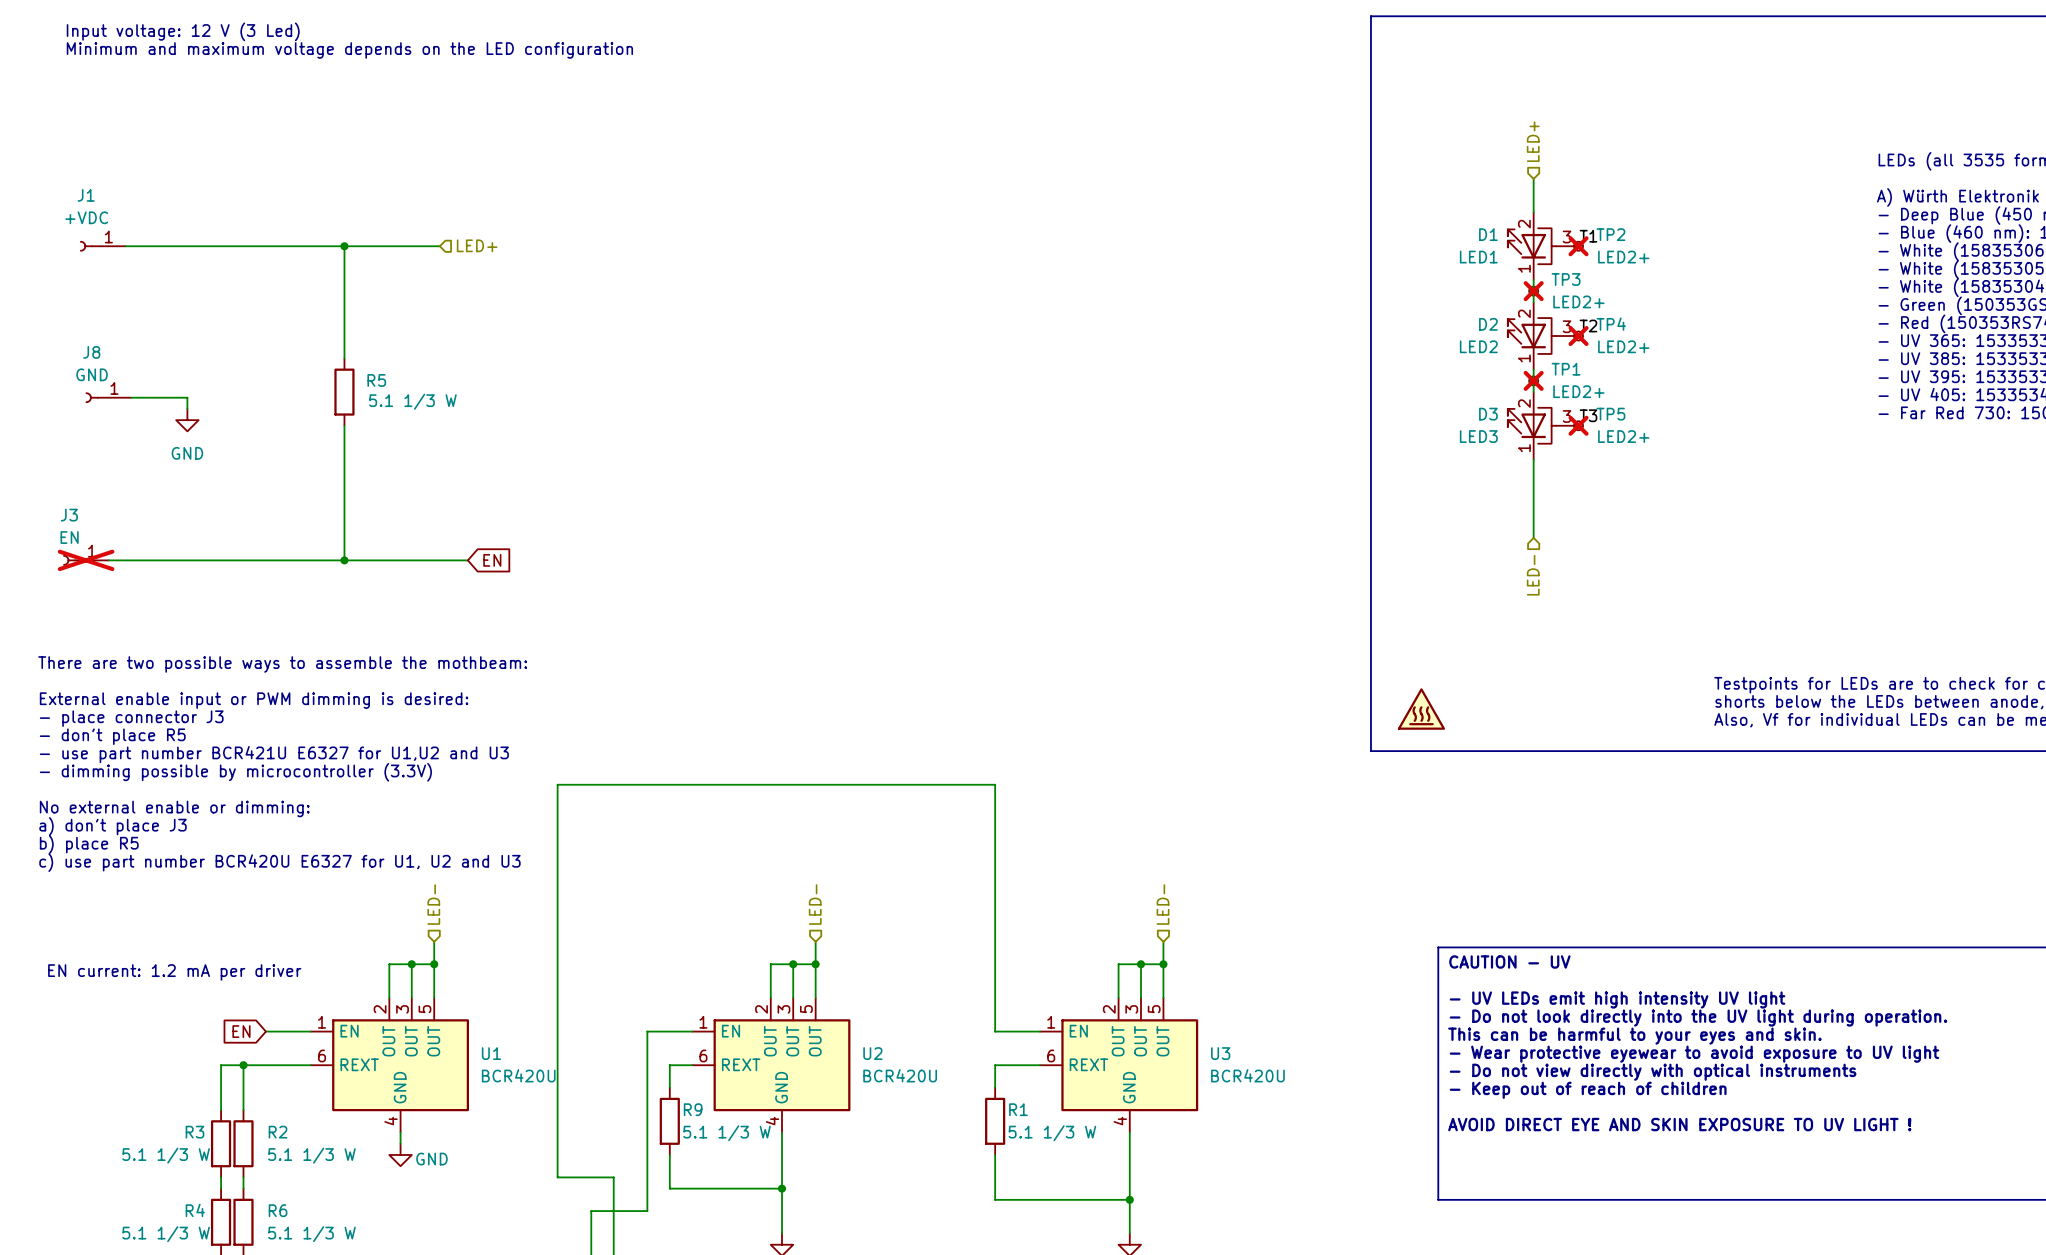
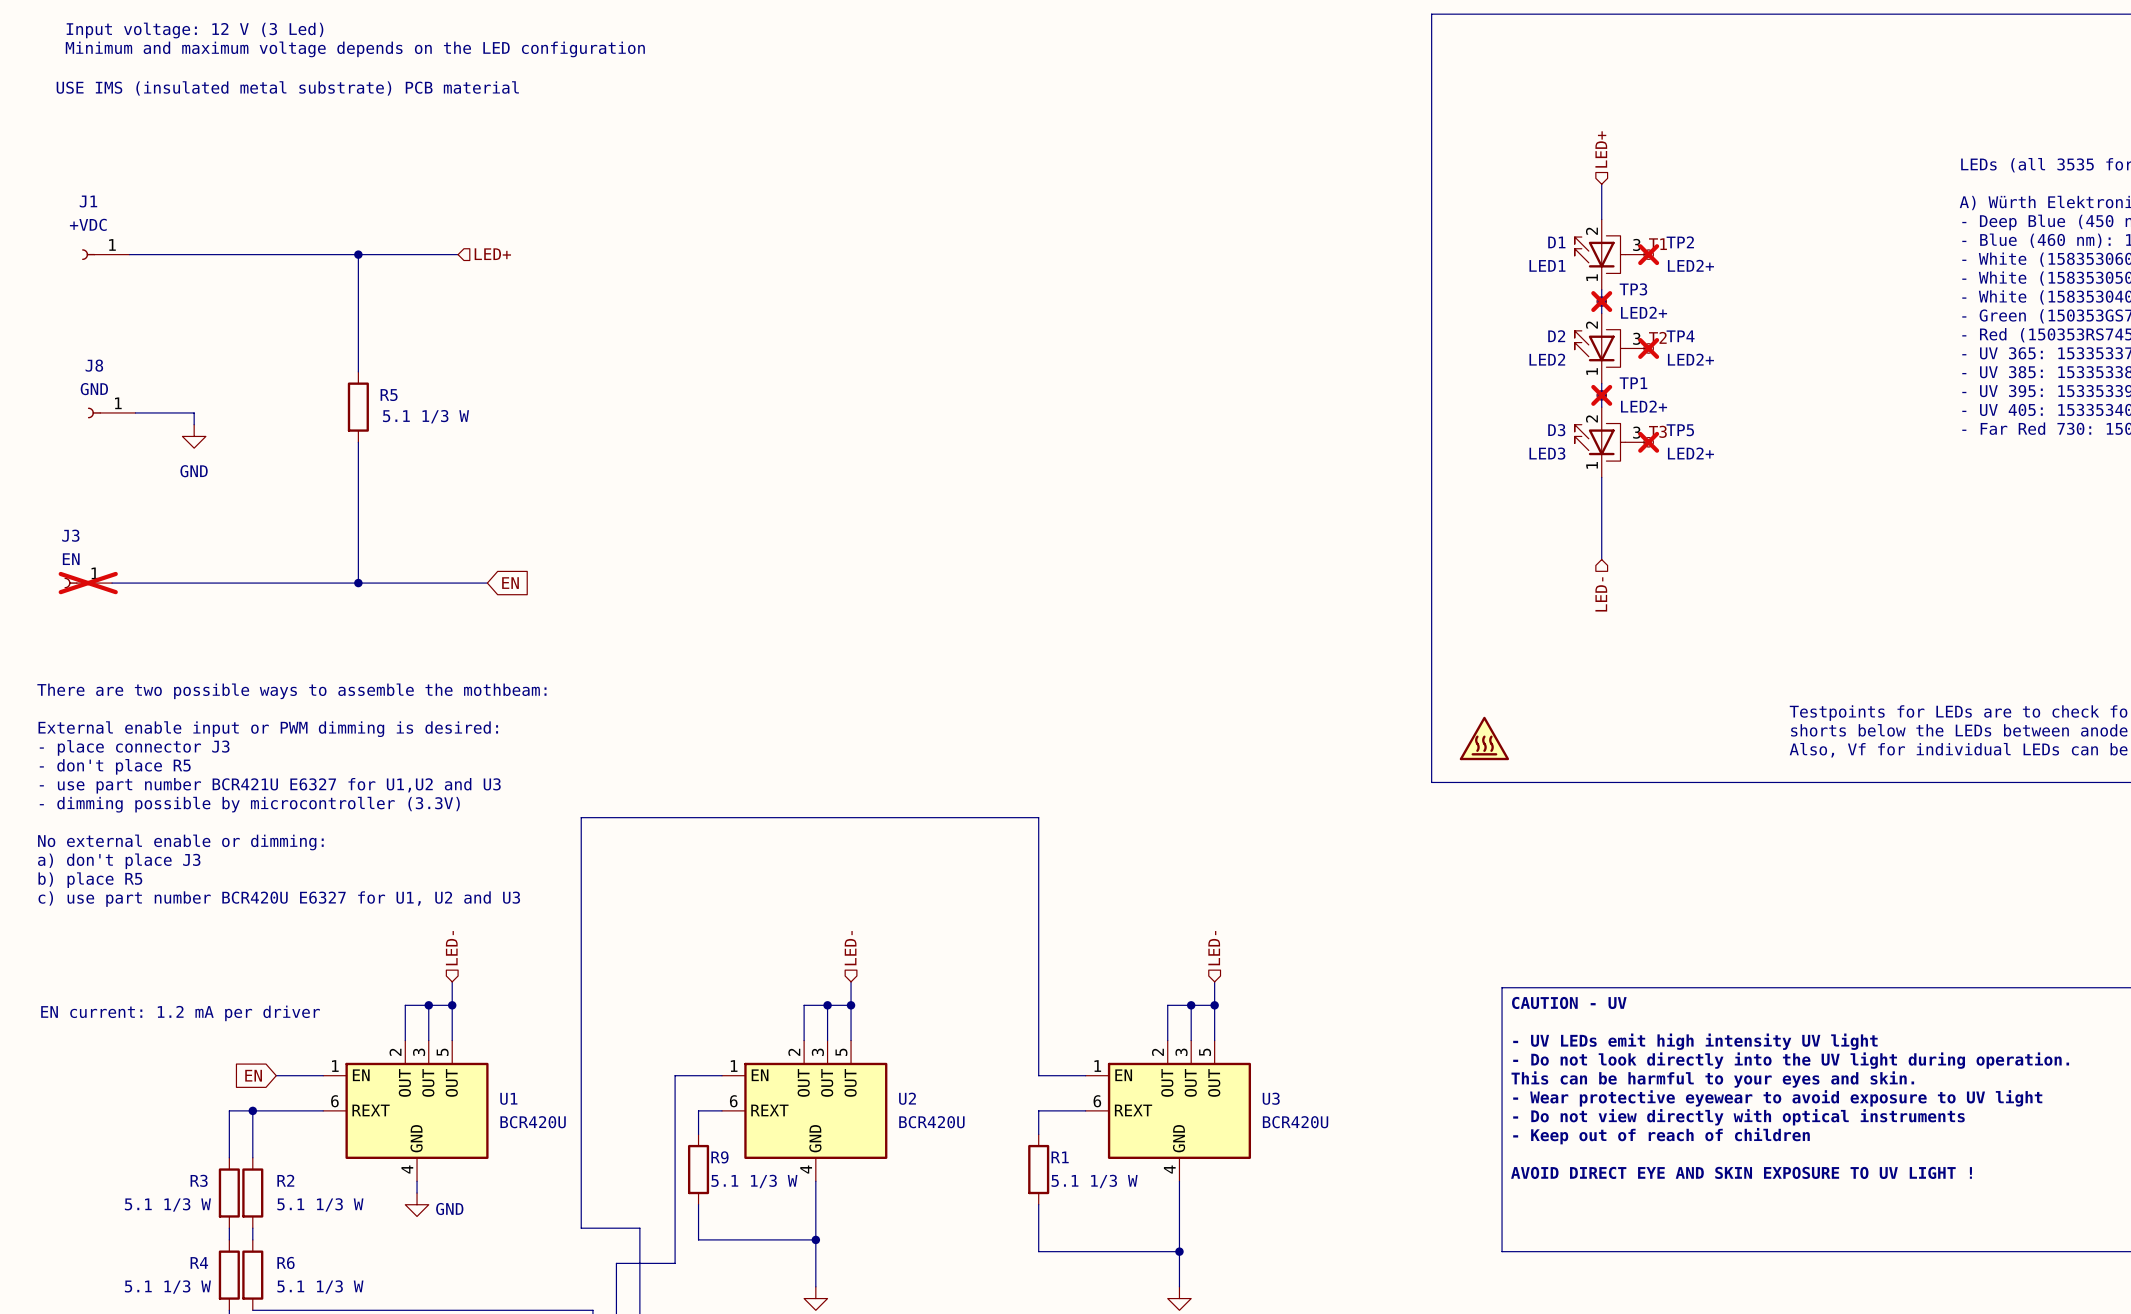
text: none -> USE IMS (insulated metal substrate) PCB material (287, 88)

